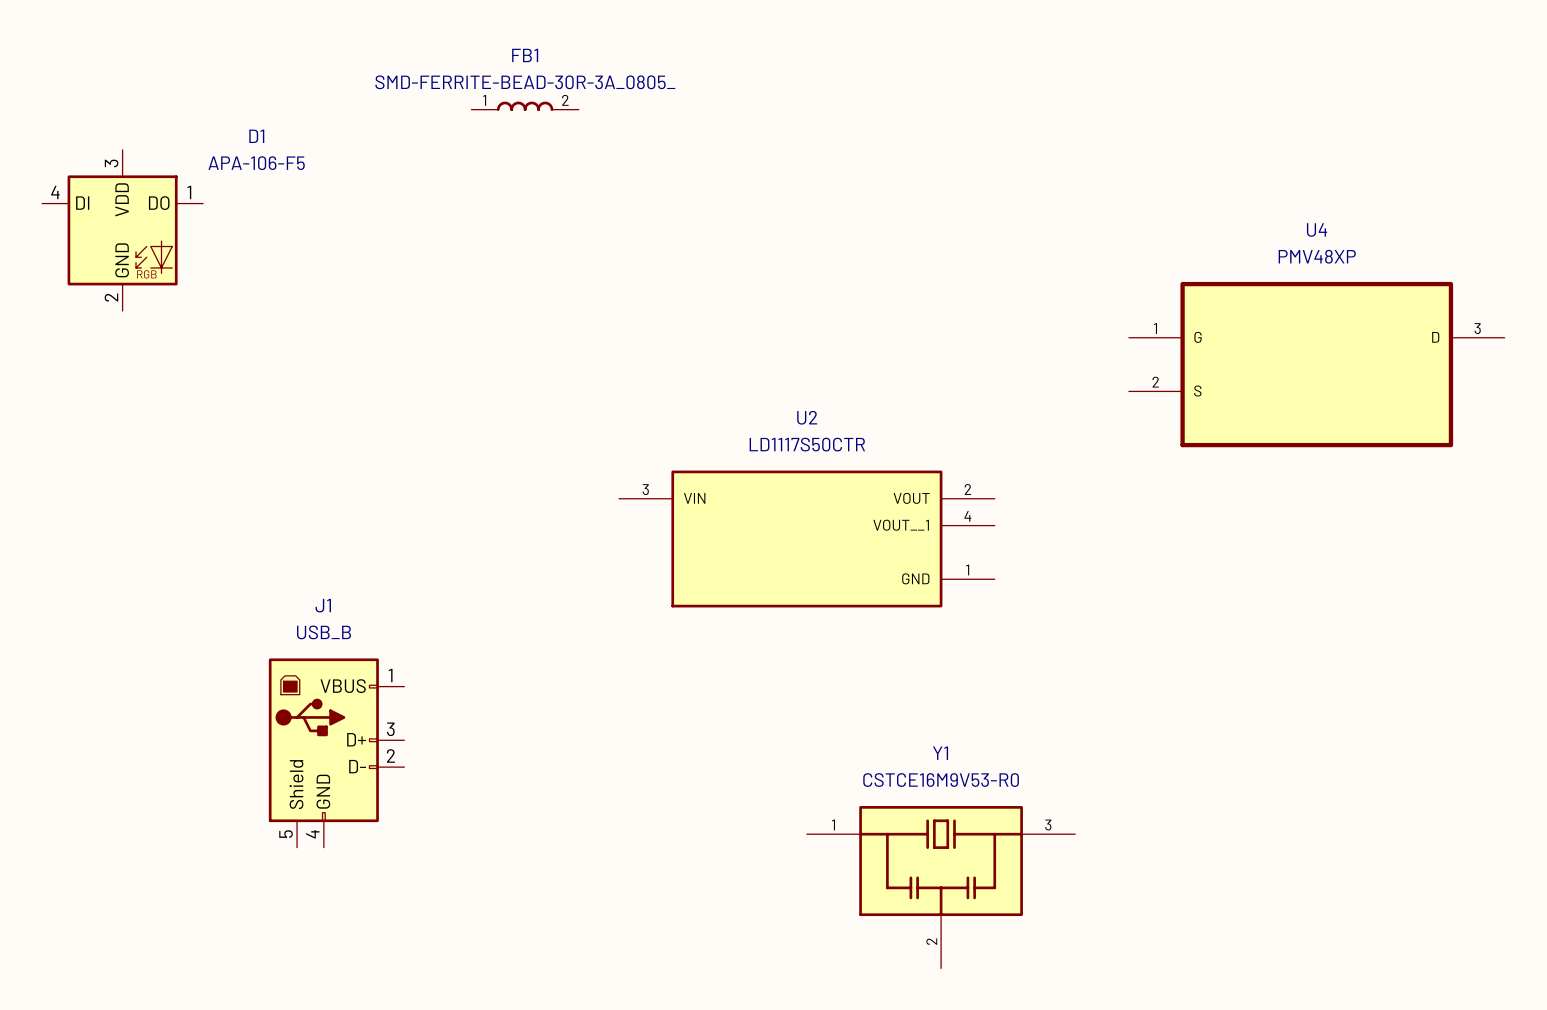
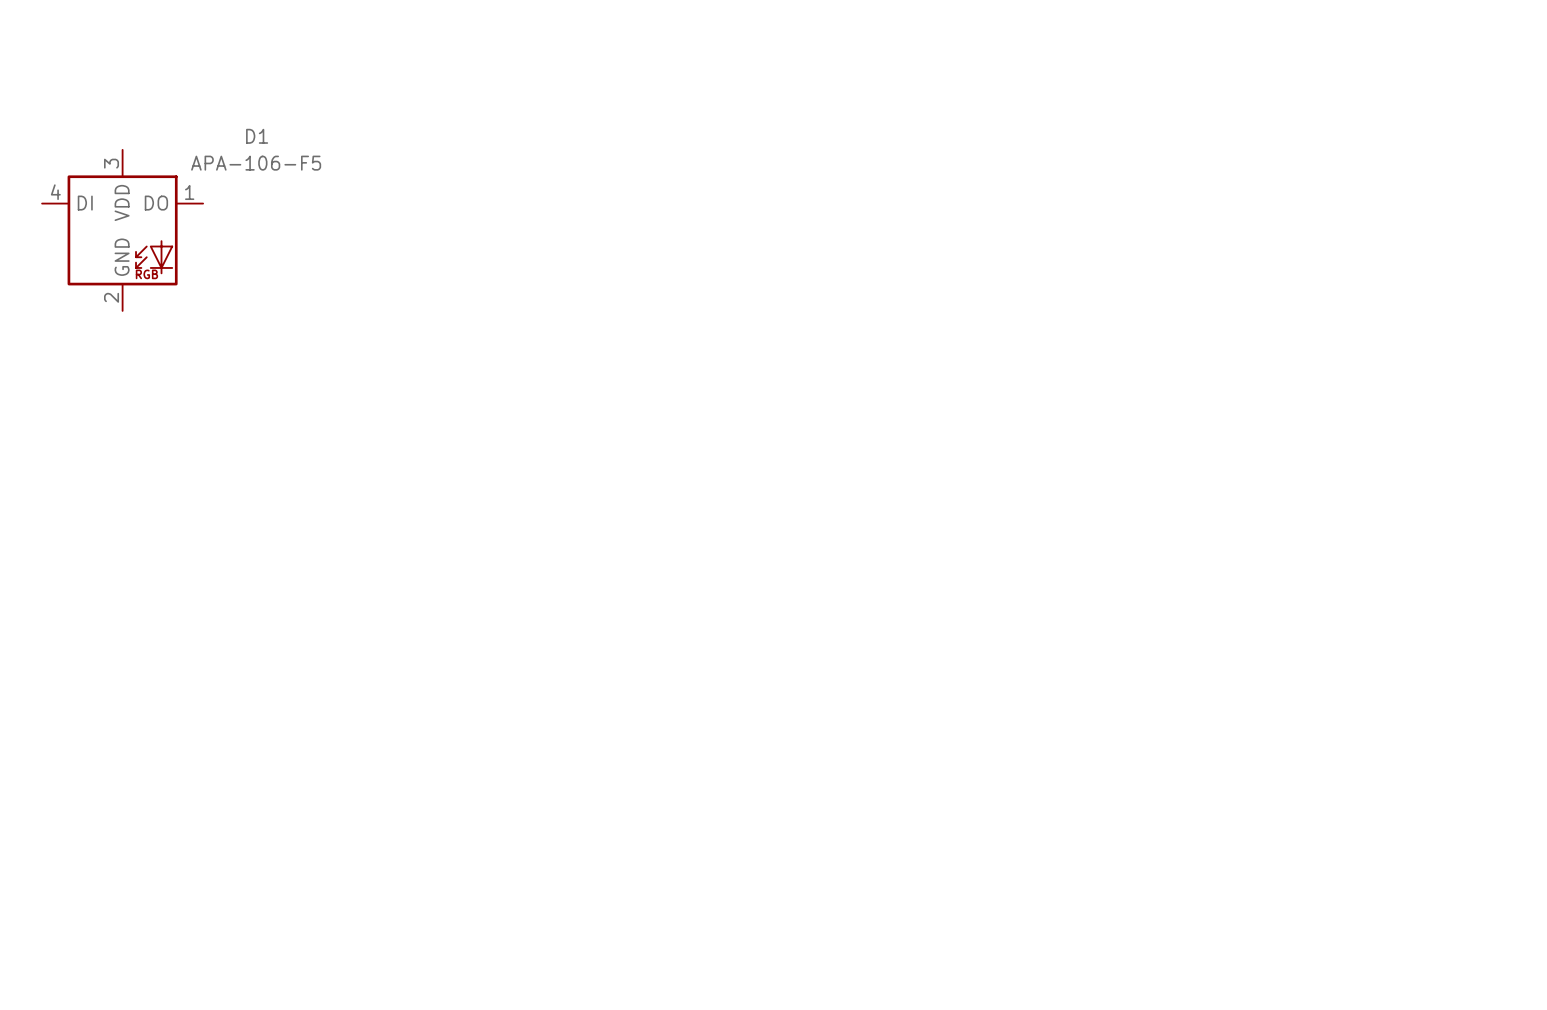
FB1: SMD-FERRITE-BEAD-30R-3A_0805_ (525, 106) -> none
U4: PMV48XP (1316, 364) -> none
U2: LD1117S50CTR (806, 539) -> none
J1: USB_B (336, 753) -> none
Y1: CSTCE16M9V53-R0 (941, 887) -> none

